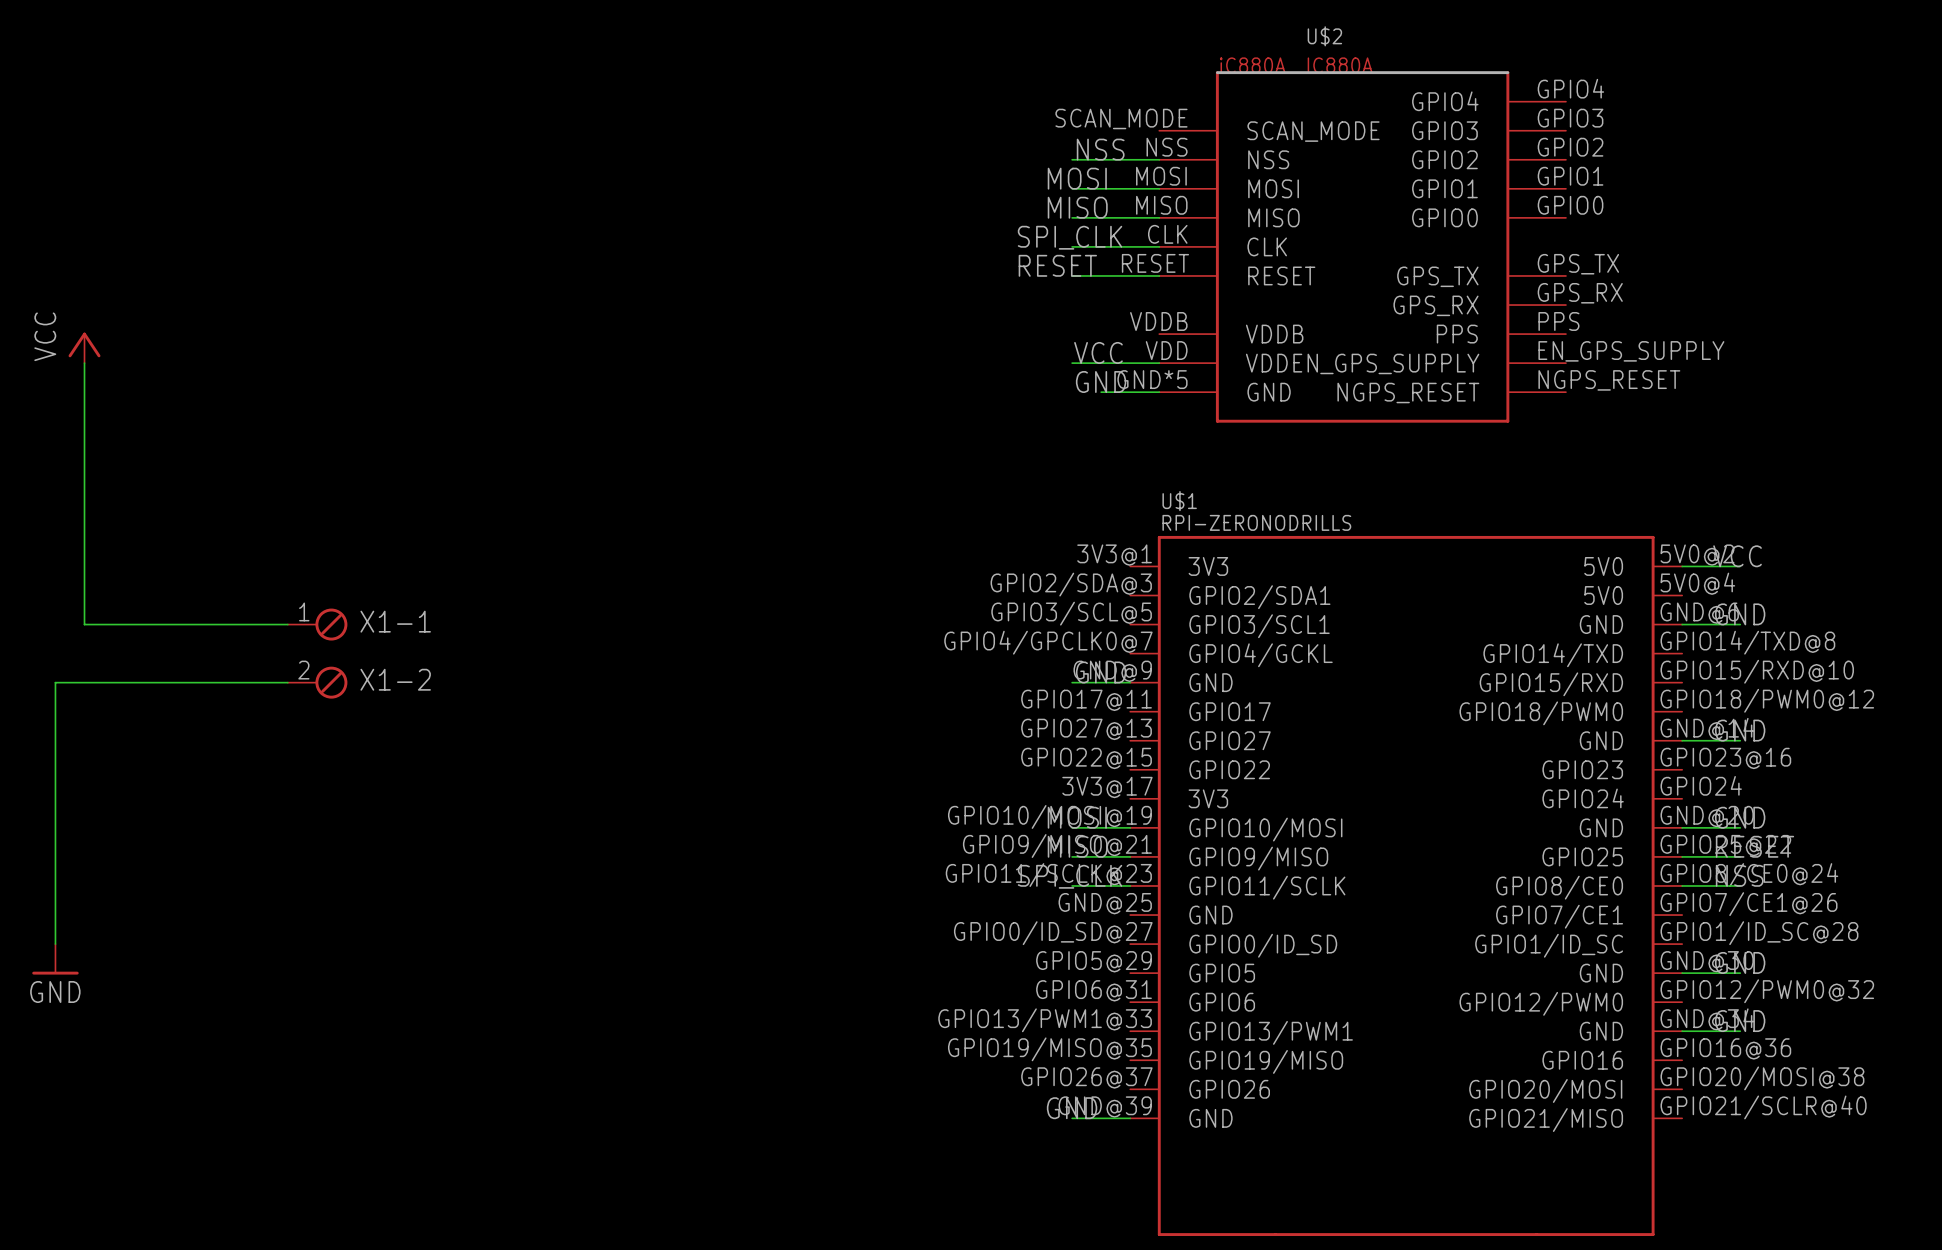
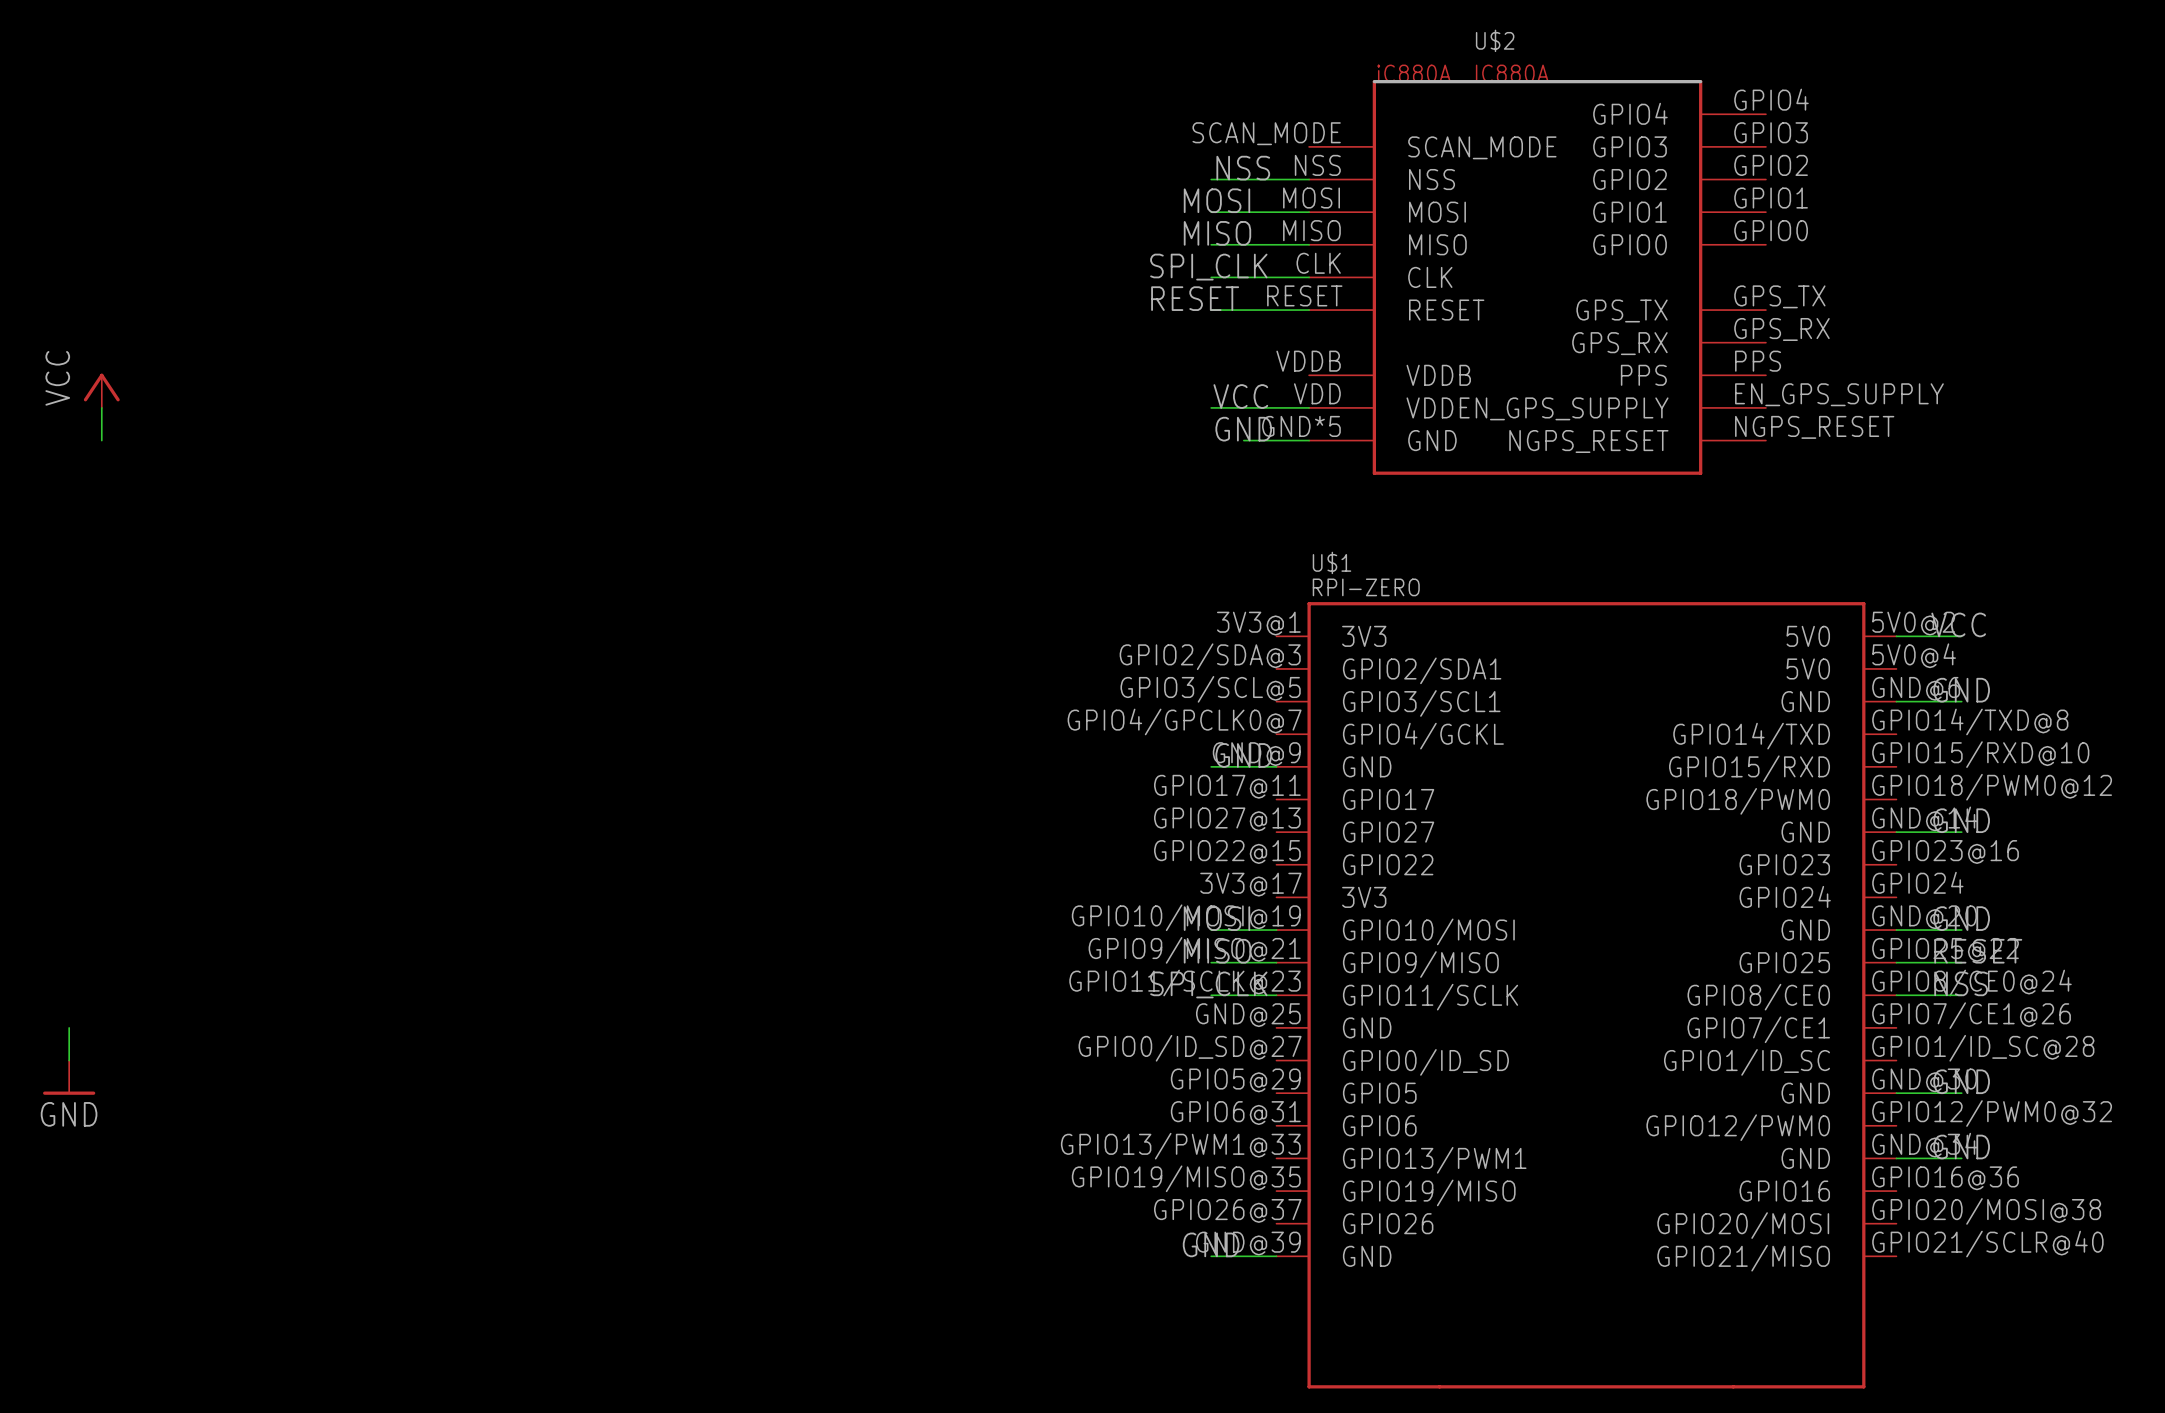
wire: (84, 392) (84, 624) (287, 624) -> none
U$1 value: RPI-ZERONODRILLS (1256, 522) -> RPI-ZERO (1366, 587)
X1-1: (317, 624) -> none
wire: (287, 682) (55, 682) (55, 915) -> none
X1-2: (317, 682) -> none

